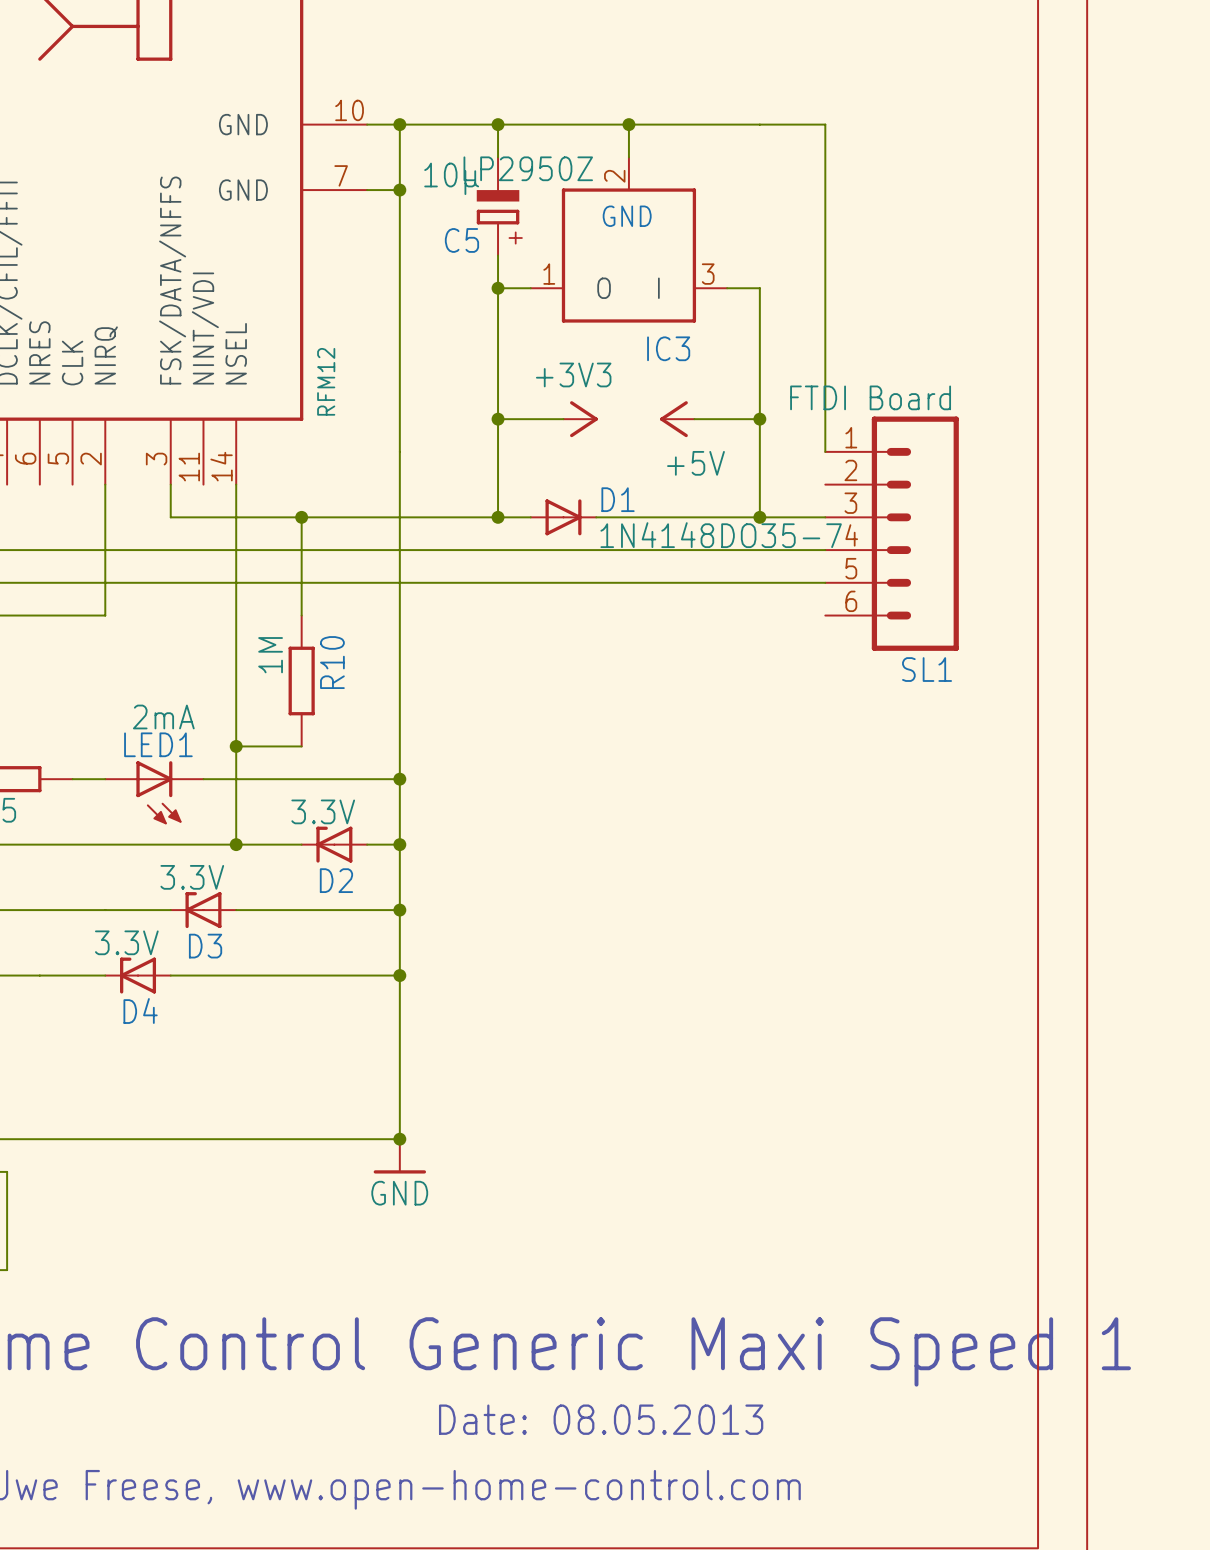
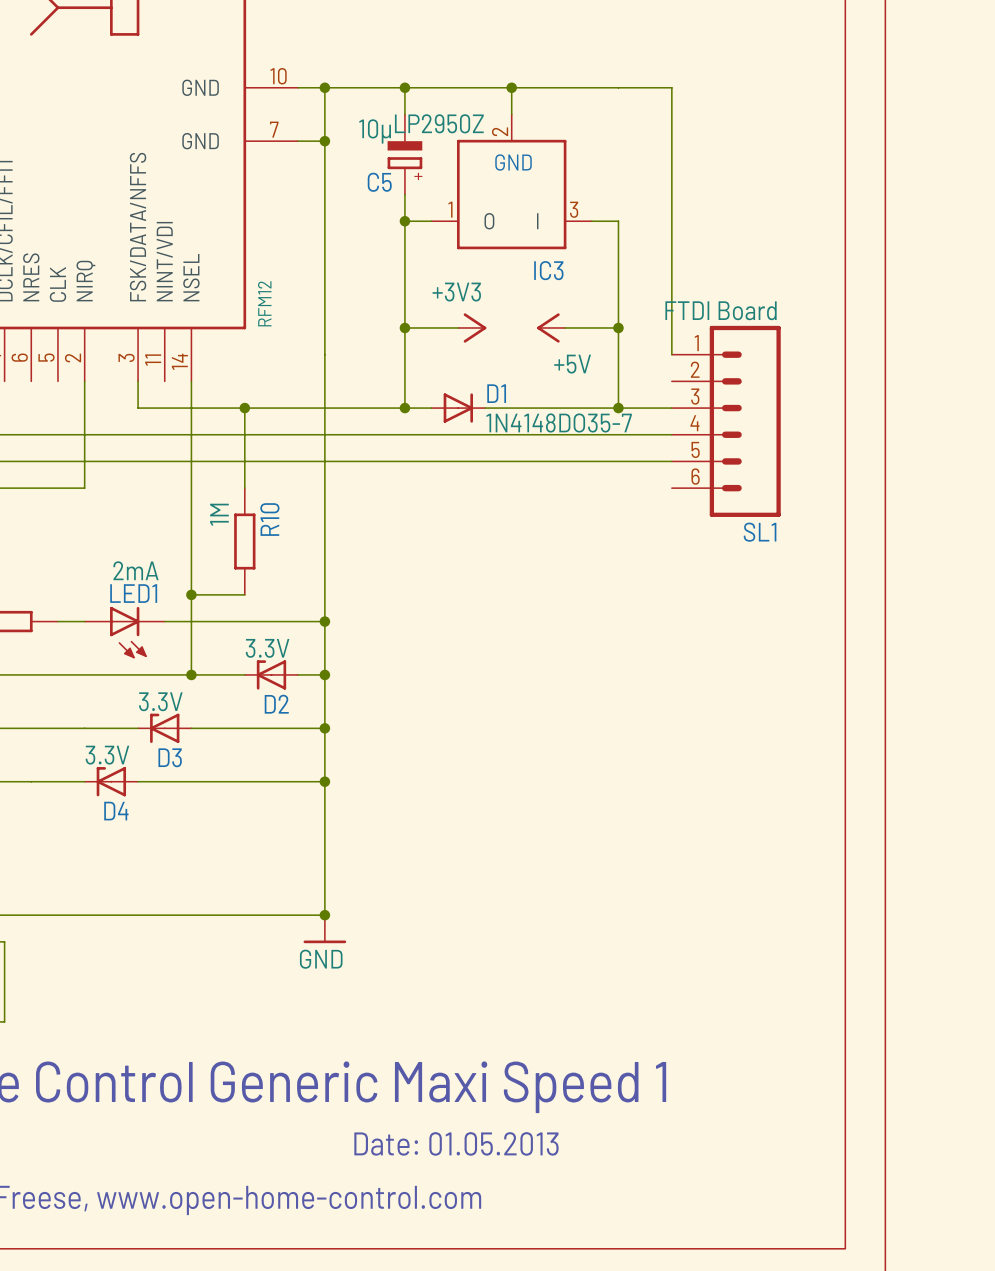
text: Date: 08.05.2013 (601, 1419) -> Date: 01.05.2013 (456, 1143)

